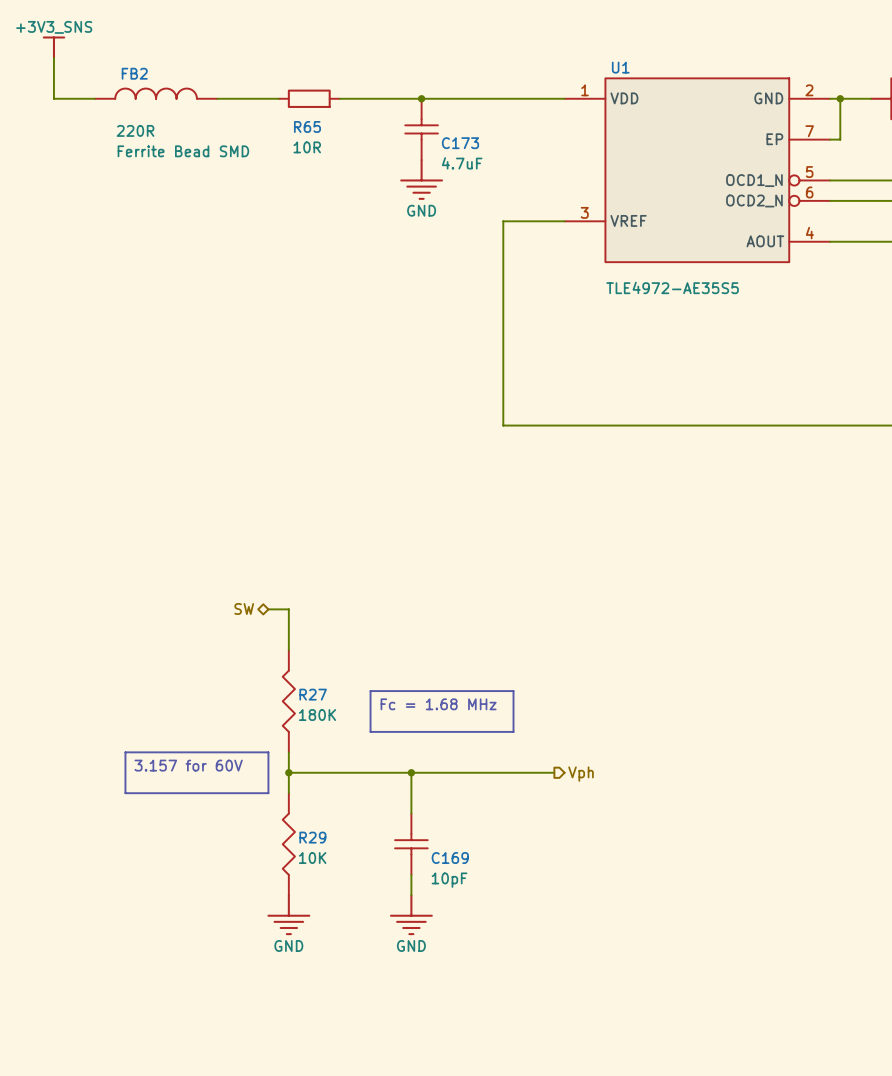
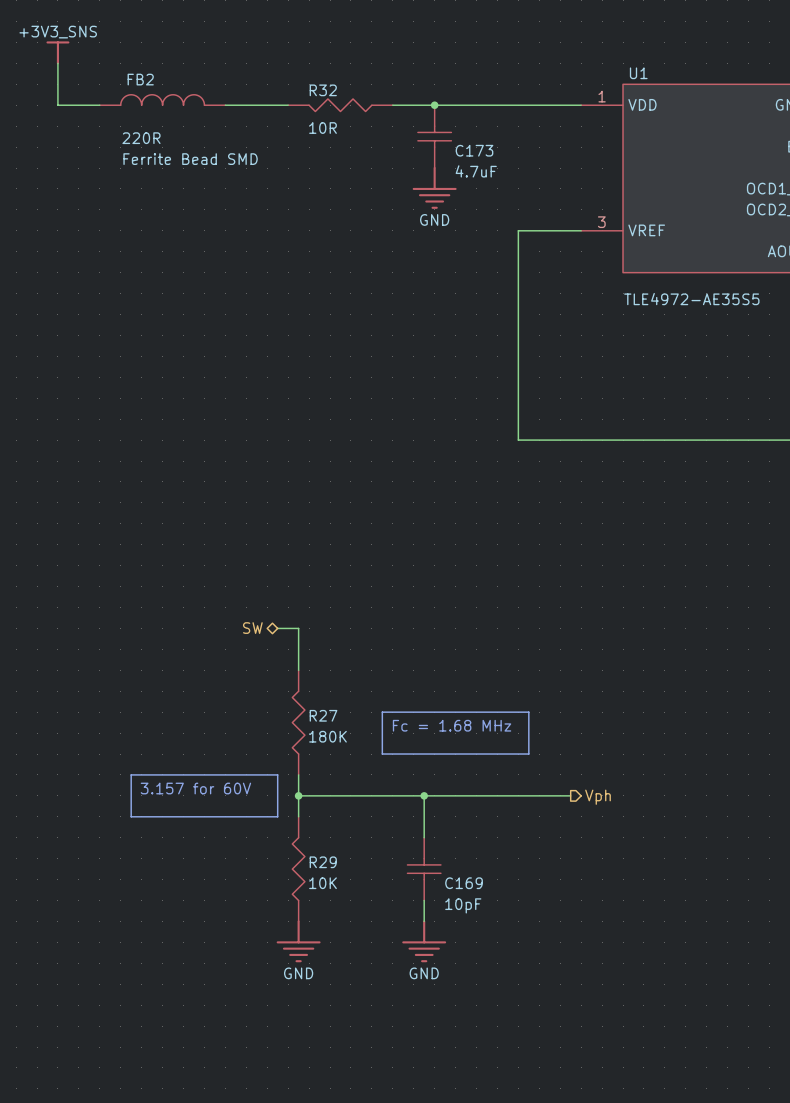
R65: 10R (309, 98) -> none
R32: none -> (340, 105)

